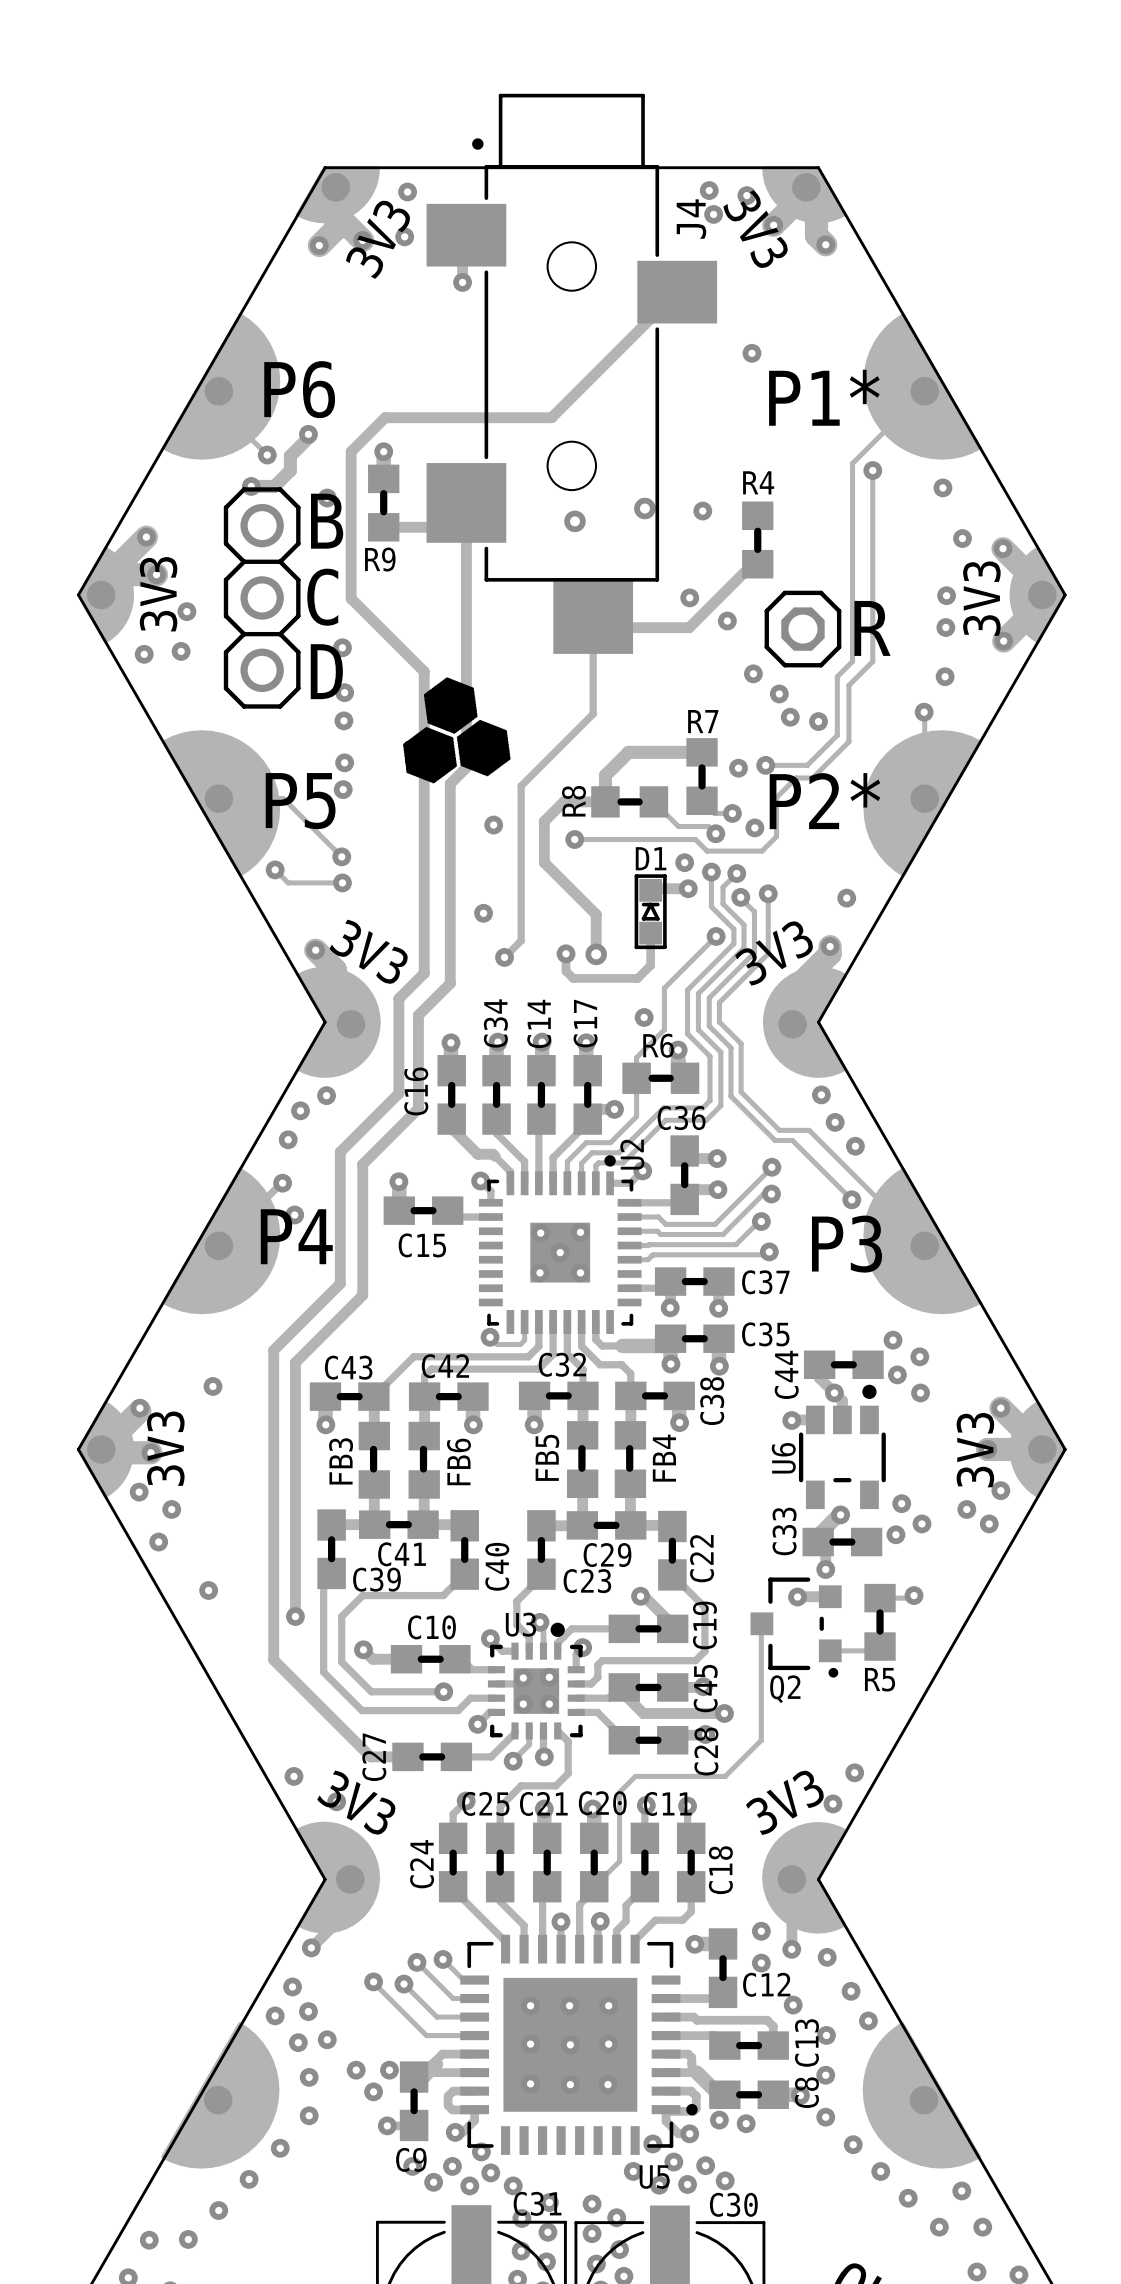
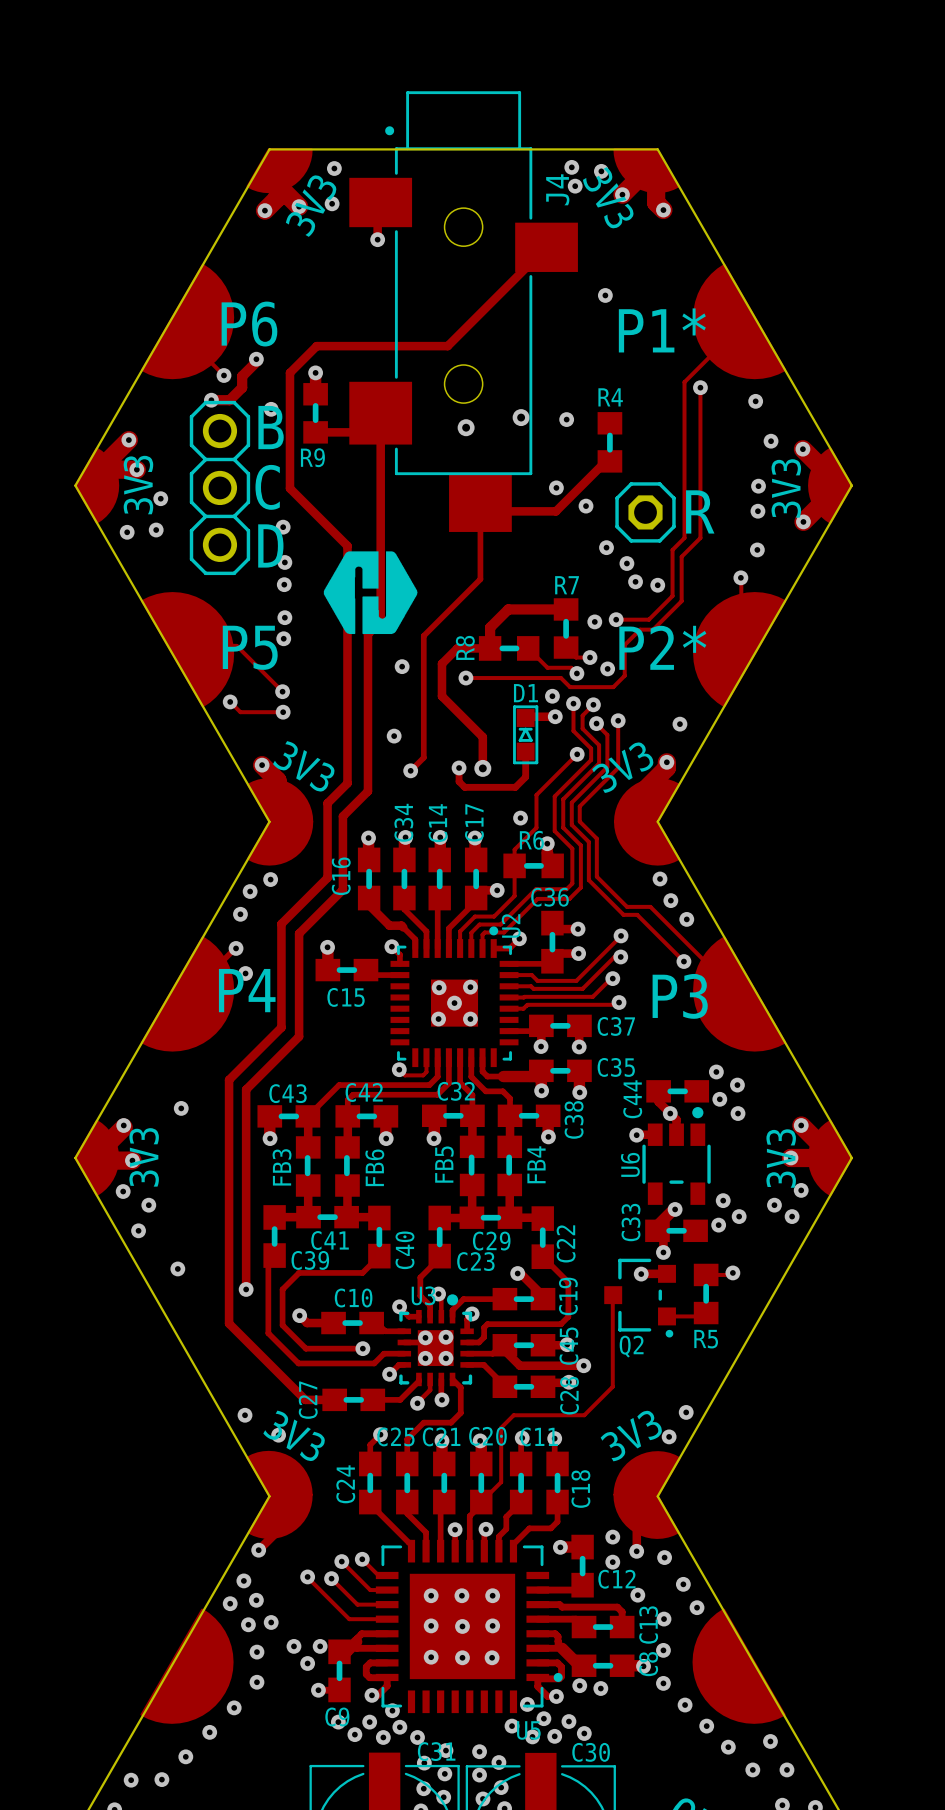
drawing: [403, 677, 511, 784] -> none
drawing: none -> [323, 551, 418, 635]

